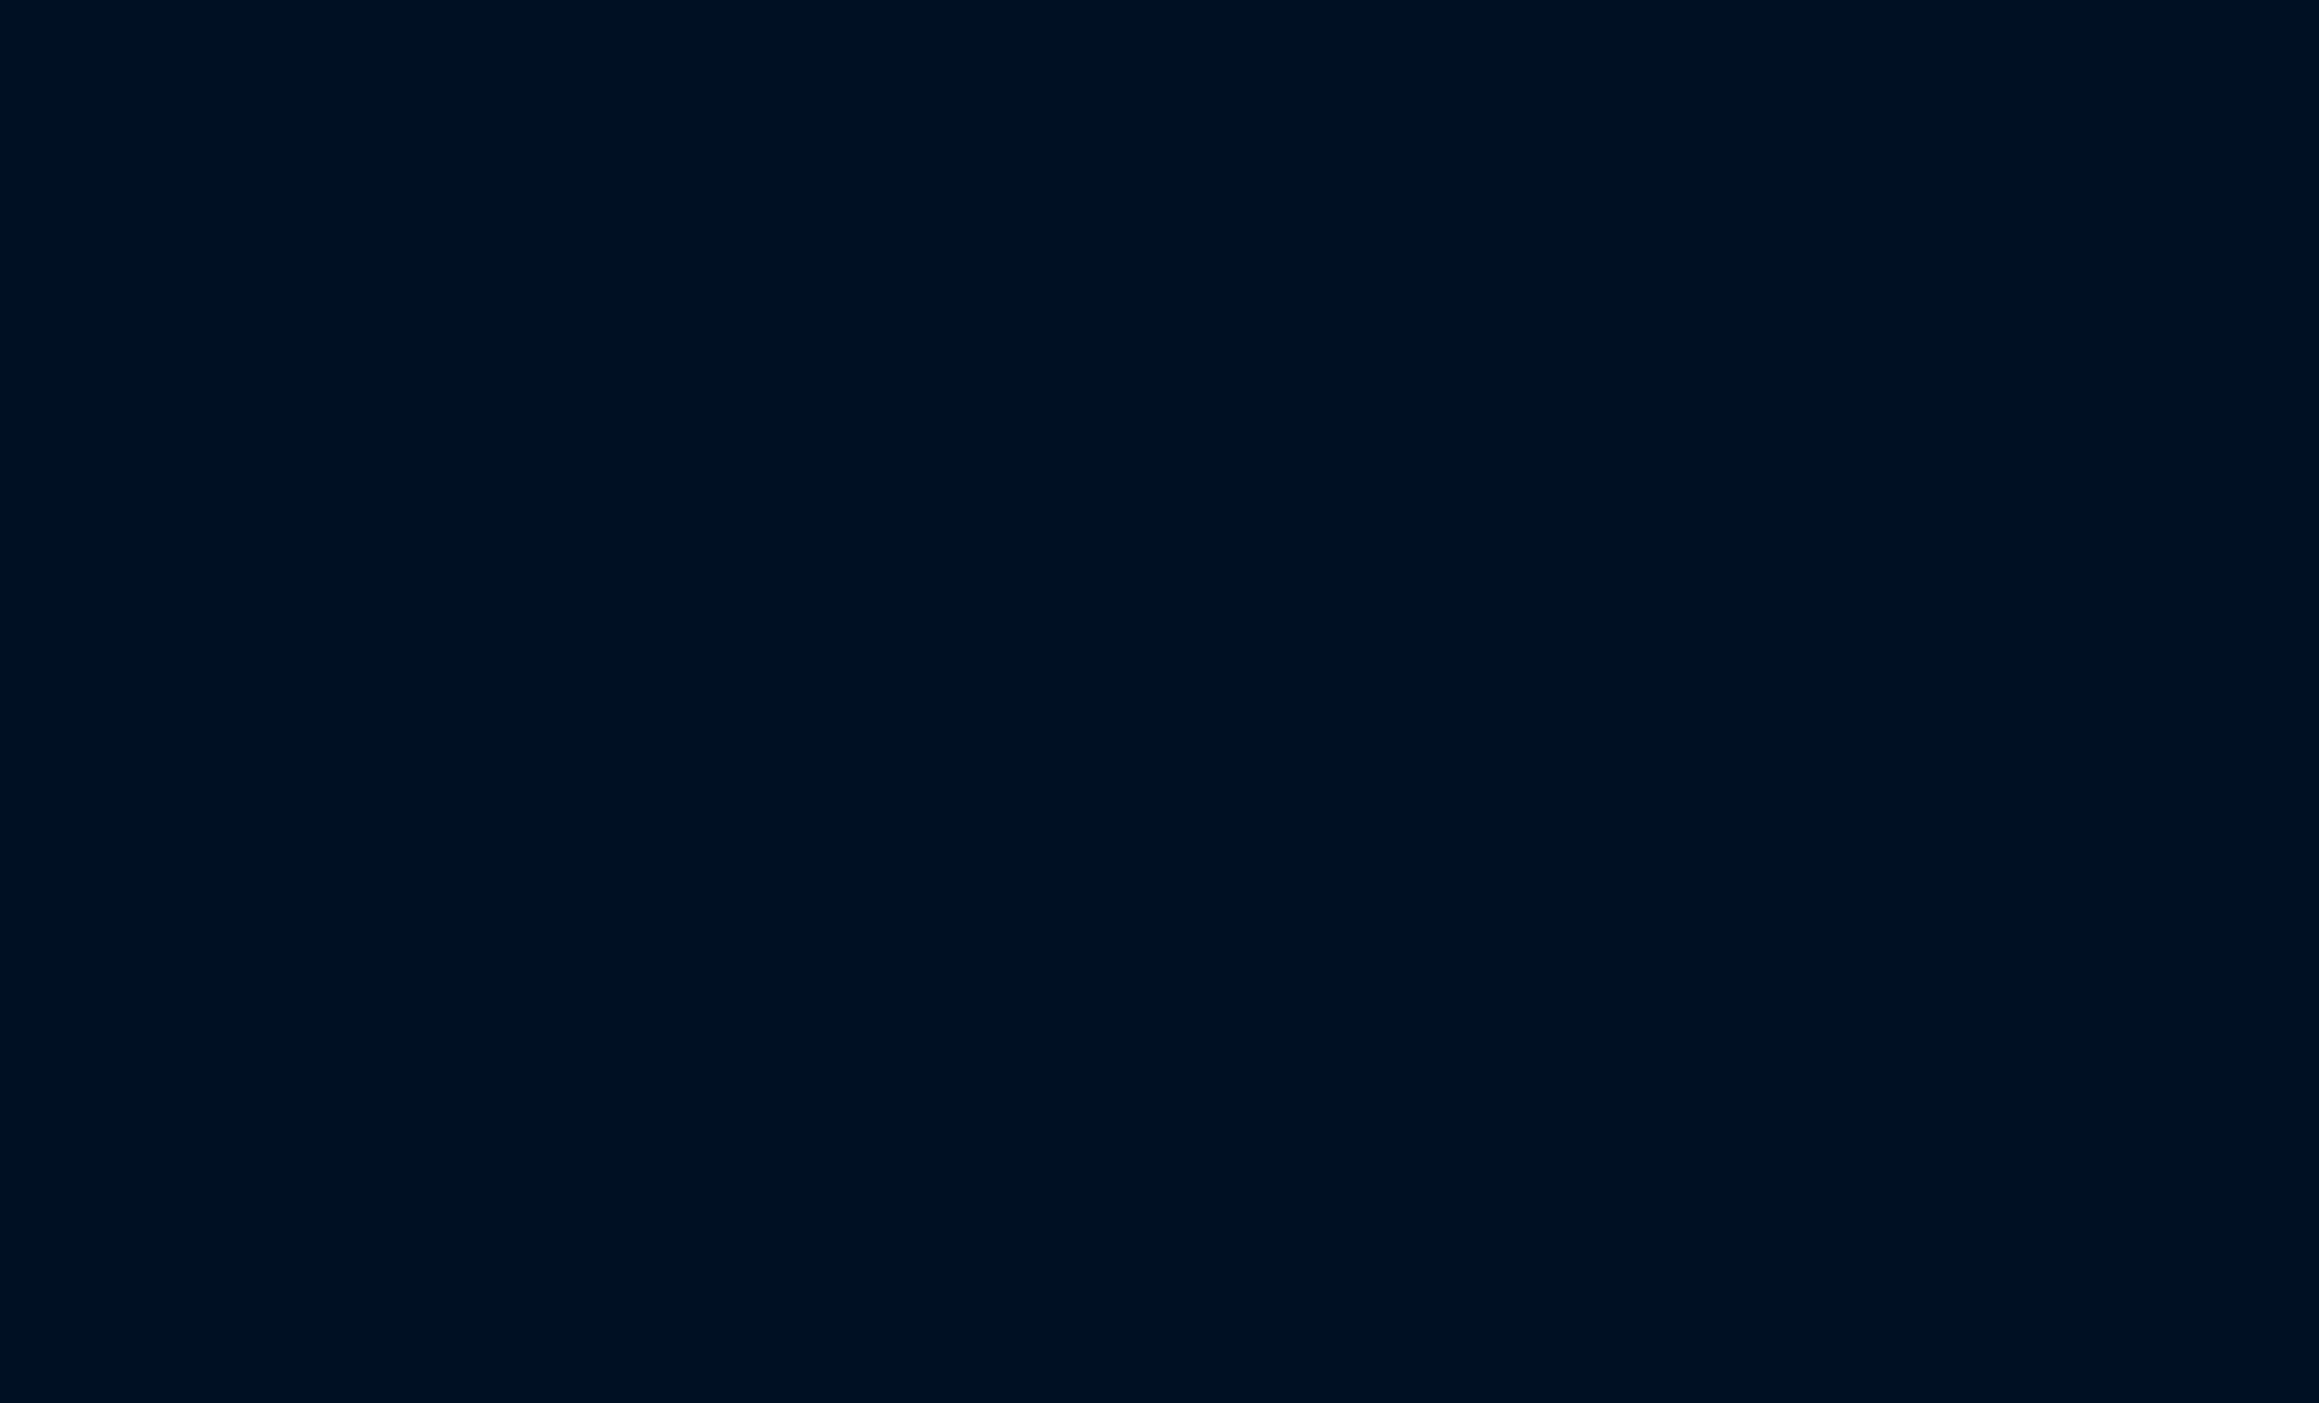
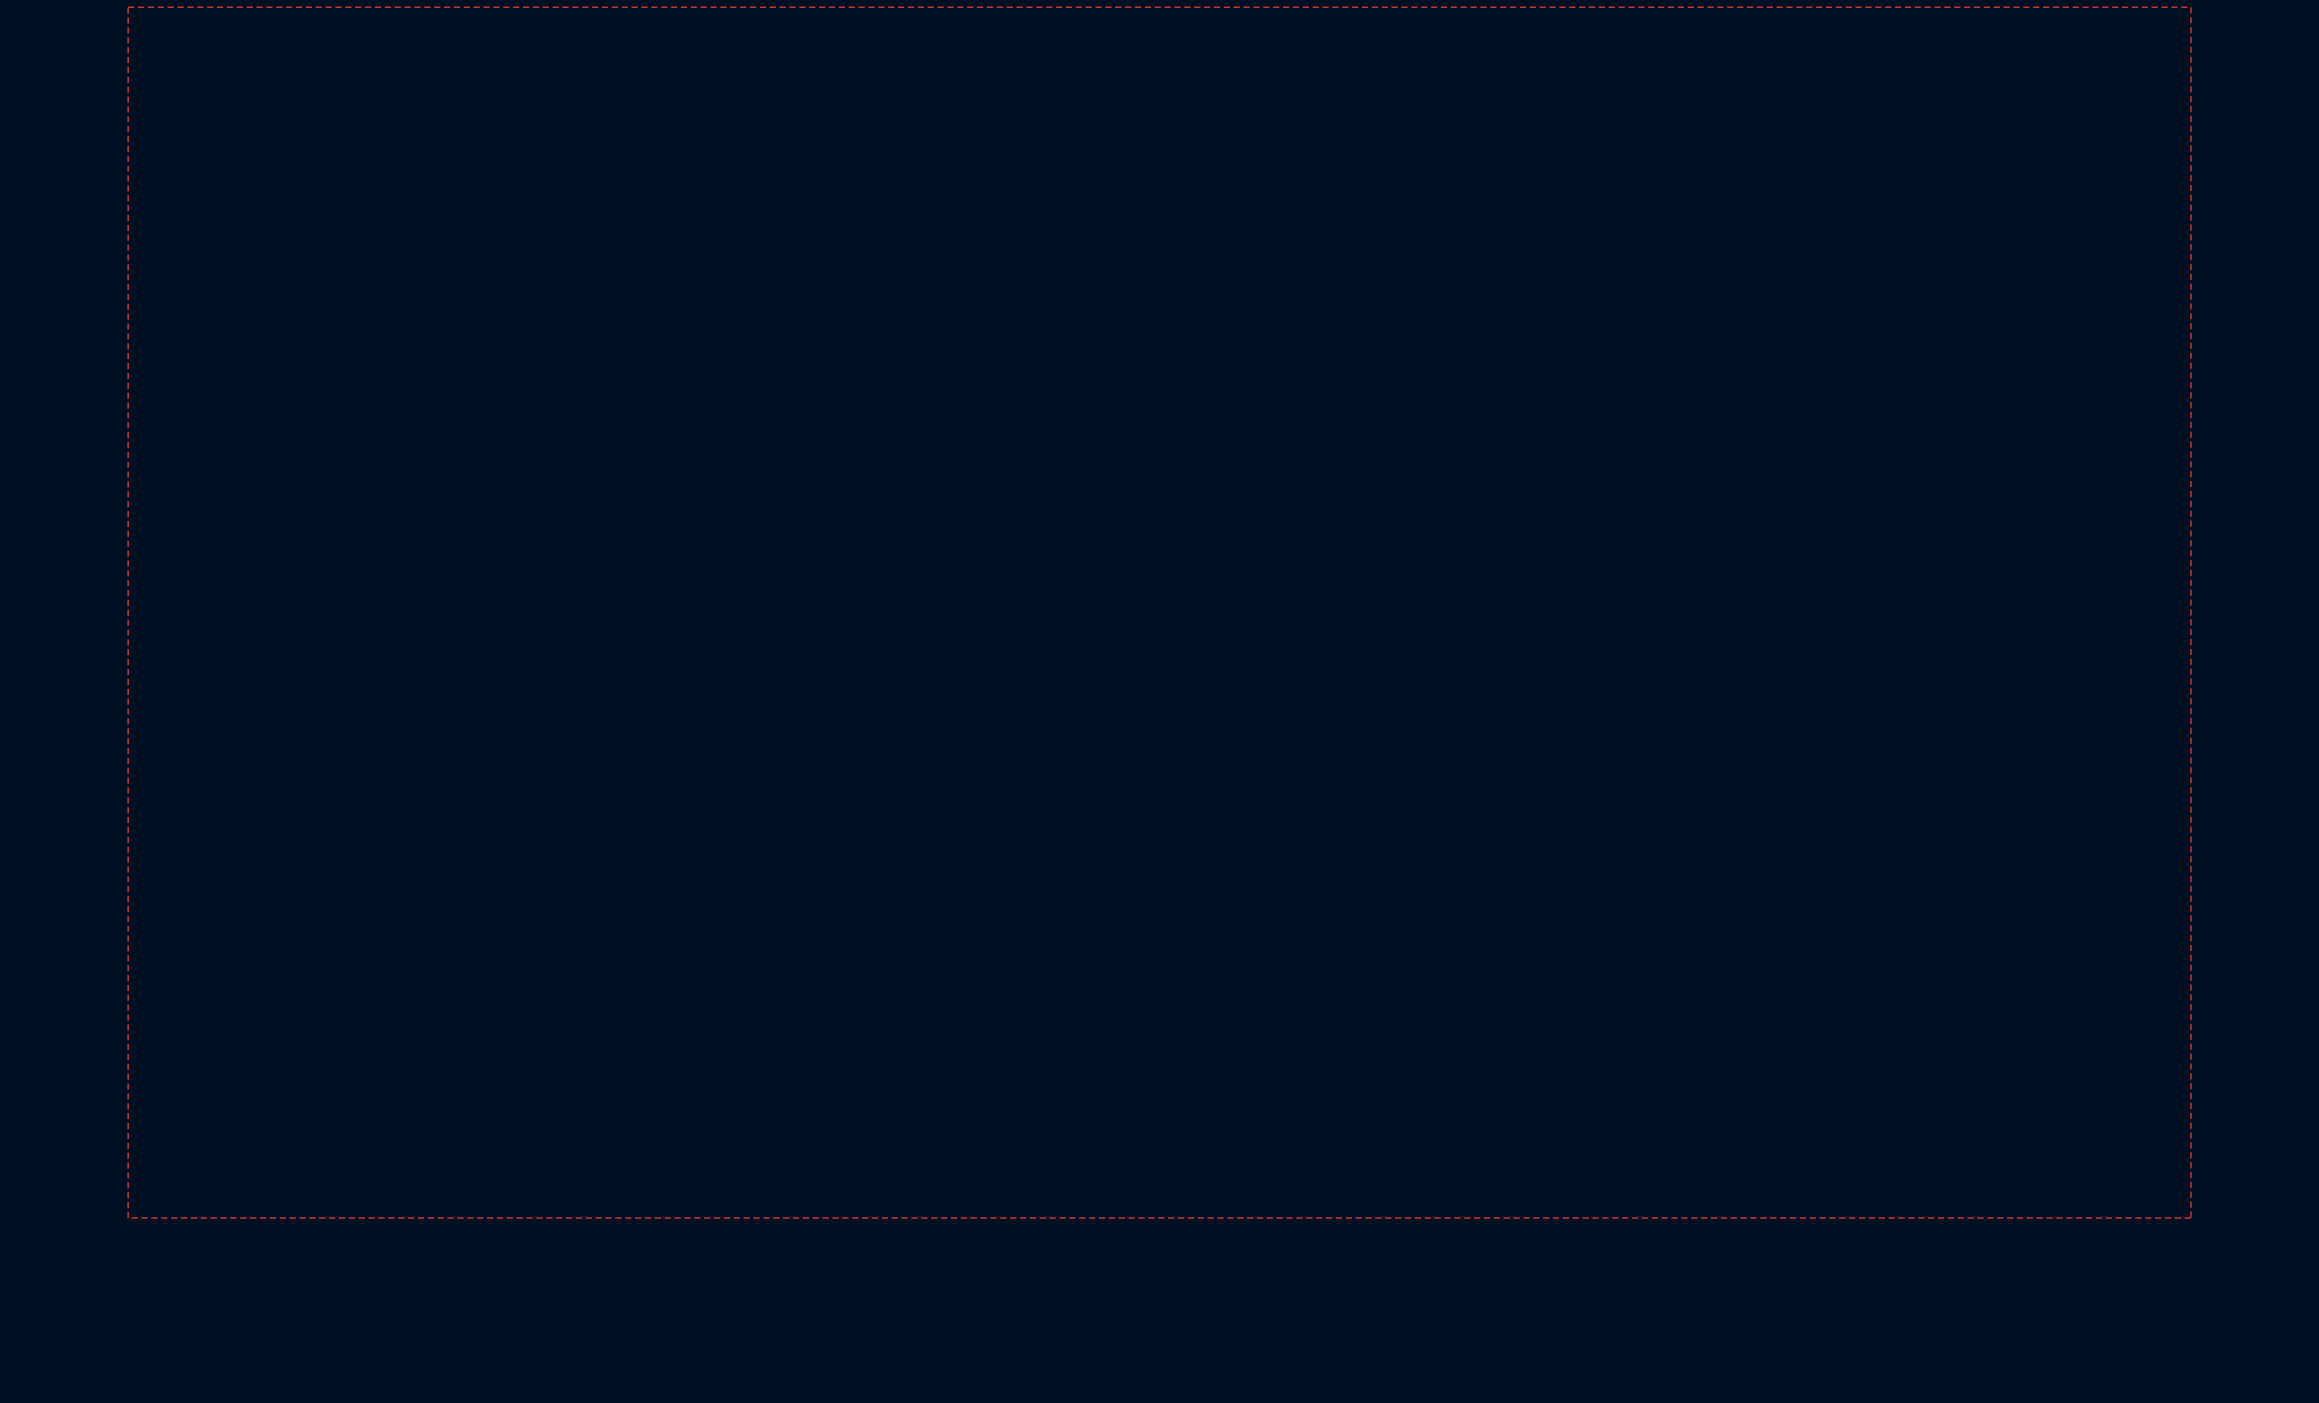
zone outline: none -> (128, 7) (128, 1217) (2190, 1217) (2190, 7) (128, 7)

